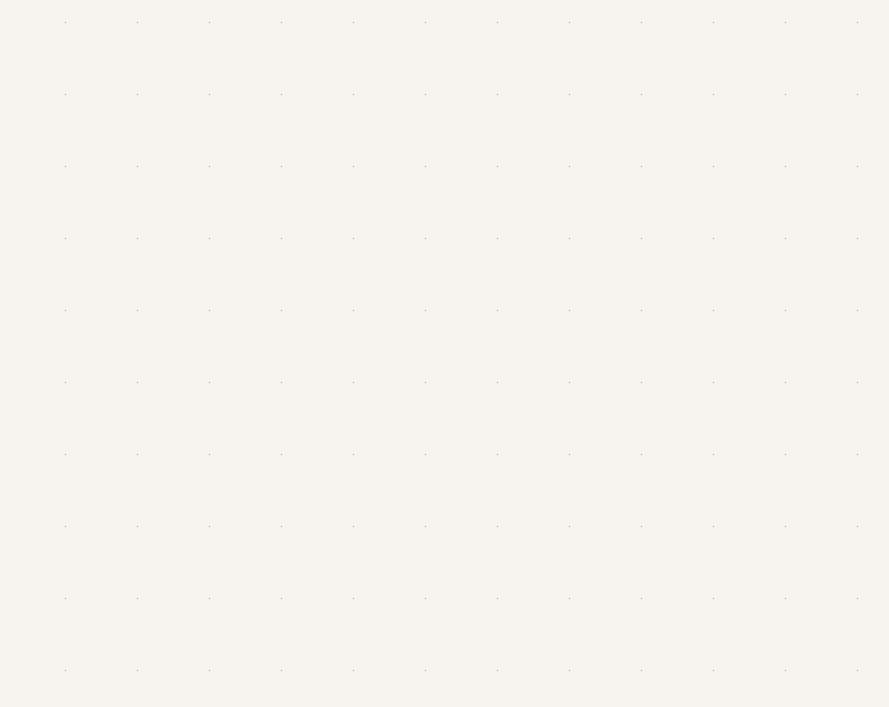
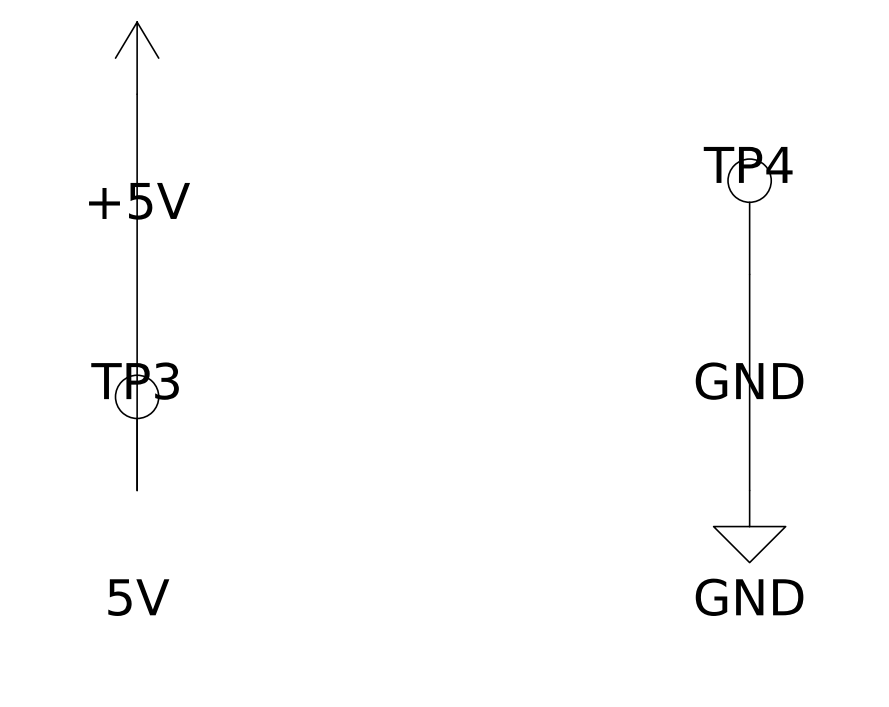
power symbol: none -> +5V (137, 58)
wire: none -> (137, 94) (137, 490)
TP4: none -> GND (749, 216)
wire: none -> (749, 274) (749, 490)
TP3: none -> 5V (137, 432)
power symbol: none -> GND (749, 526)

